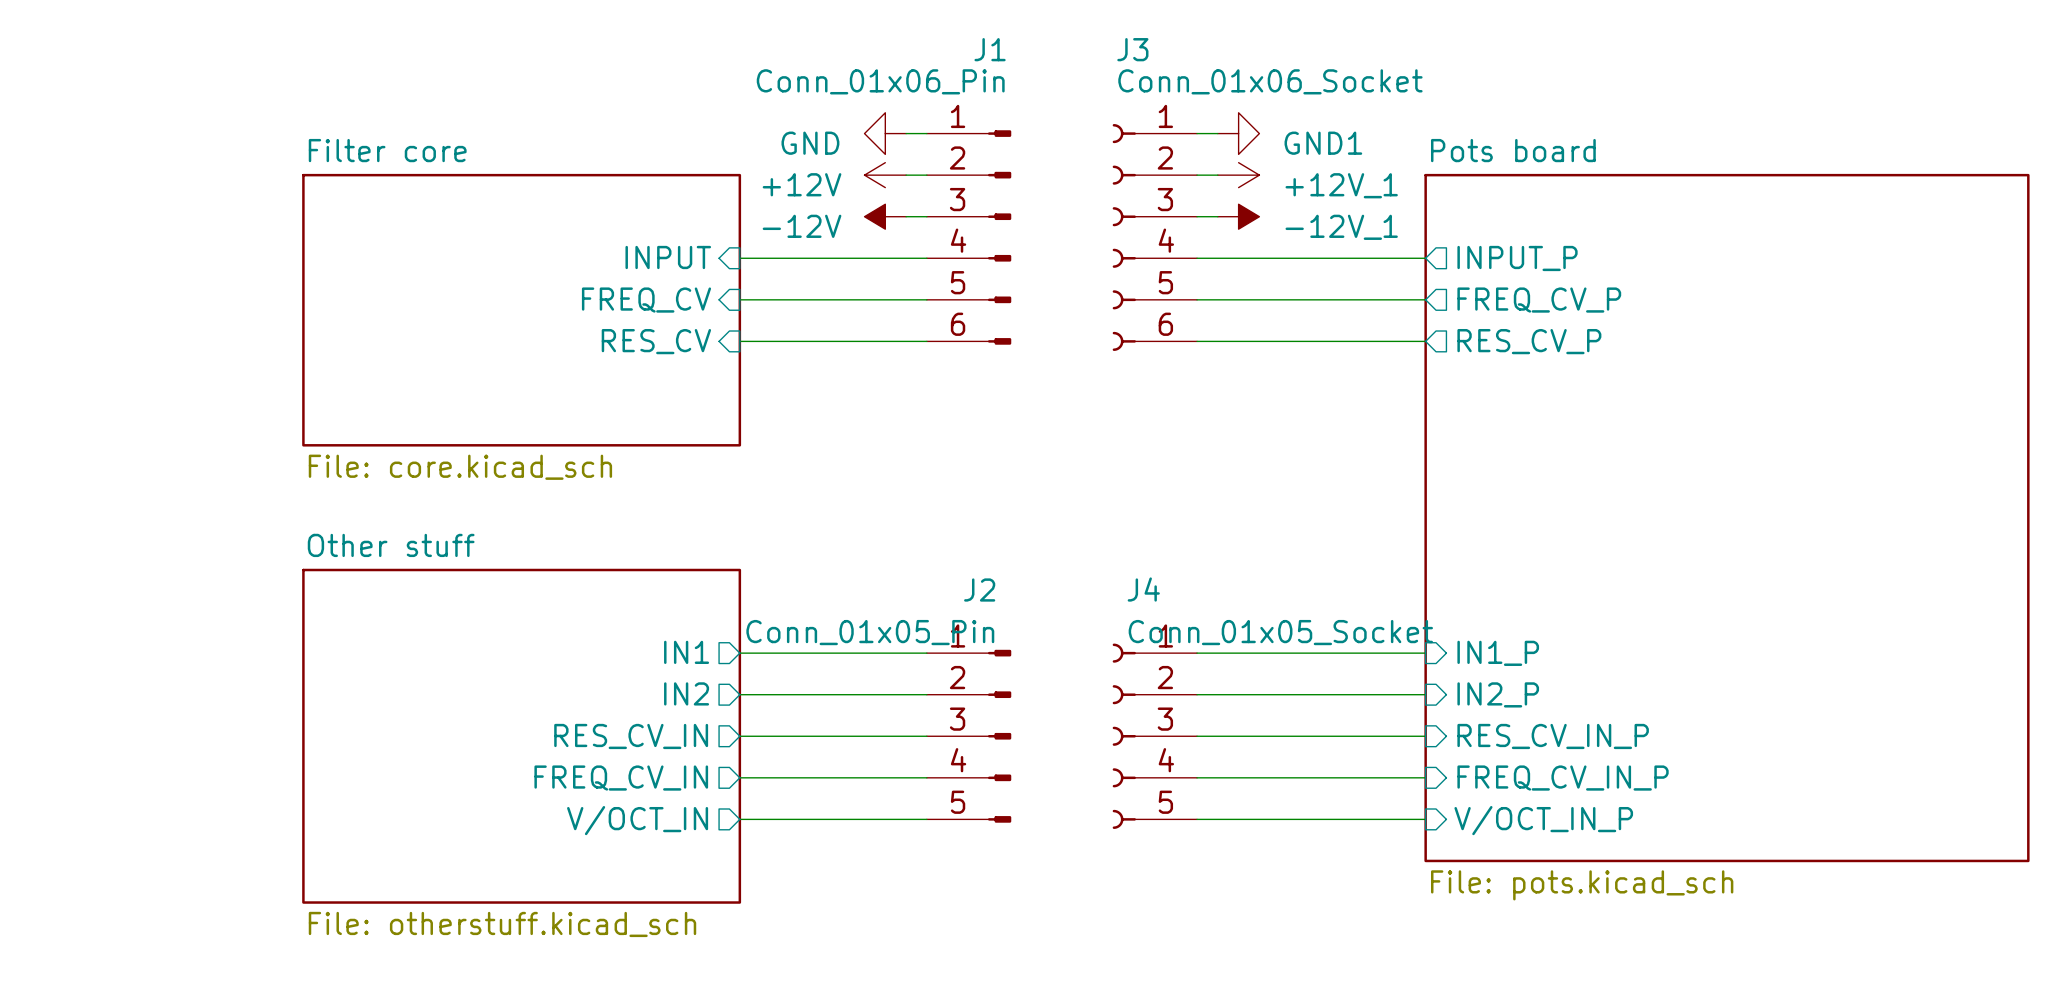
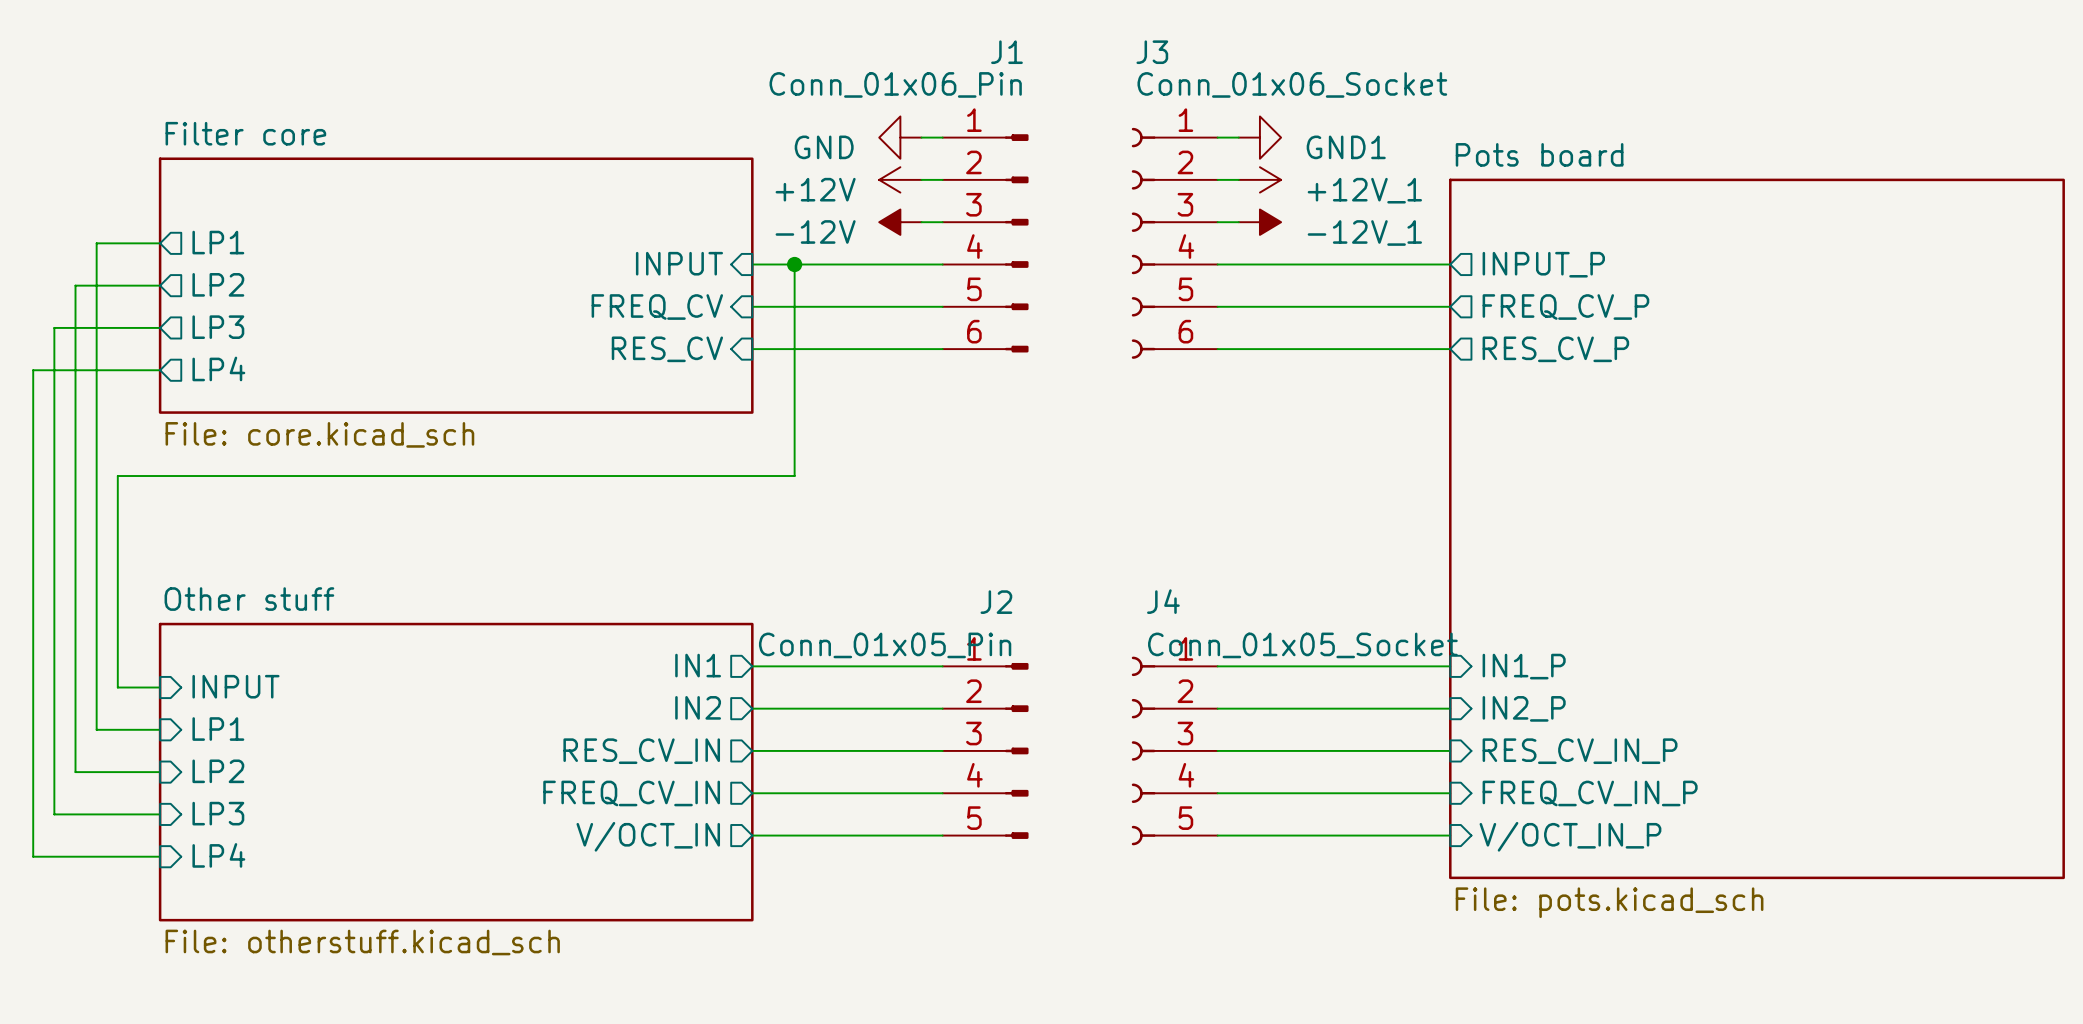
sheet pin: none -> LP1 (218, 242)
wire: none -> (160, 243) (96, 243) (96, 729) (160, 729)
wire: none -> (794, 264) (794, 476) (117, 476) (117, 687) (160, 687)
junction: none -> (794, 264)
sheet pin: none -> LP2 (218, 284)
wire: none -> (160, 285) (75, 285) (75, 772) (160, 772)
sheet Filter core: none -> File: core.kicad_sch (456, 285)
sheet Filter core: File: core.kicad_sch (521, 310) -> none
sheet pin: none -> LP3 (218, 327)
wire: none -> (160, 327) (54, 327) (54, 814) (160, 814)
sheet pin: none -> LP4 (218, 368)
wire: none -> (160, 370) (33, 370) (33, 856) (160, 856)
sheet pin: none -> INPUT (235, 686)
sheet pin: none -> LP1 (218, 729)
sheet Other stuff: File: otherstuff.kicad_sch (521, 736) -> none
sheet pin: none -> LP2 (218, 771)
sheet Other stuff: none -> File: otherstuff.kicad_sch (456, 772)
sheet pin: none -> LP3 (218, 813)
sheet pin: none -> LP4 (218, 855)

